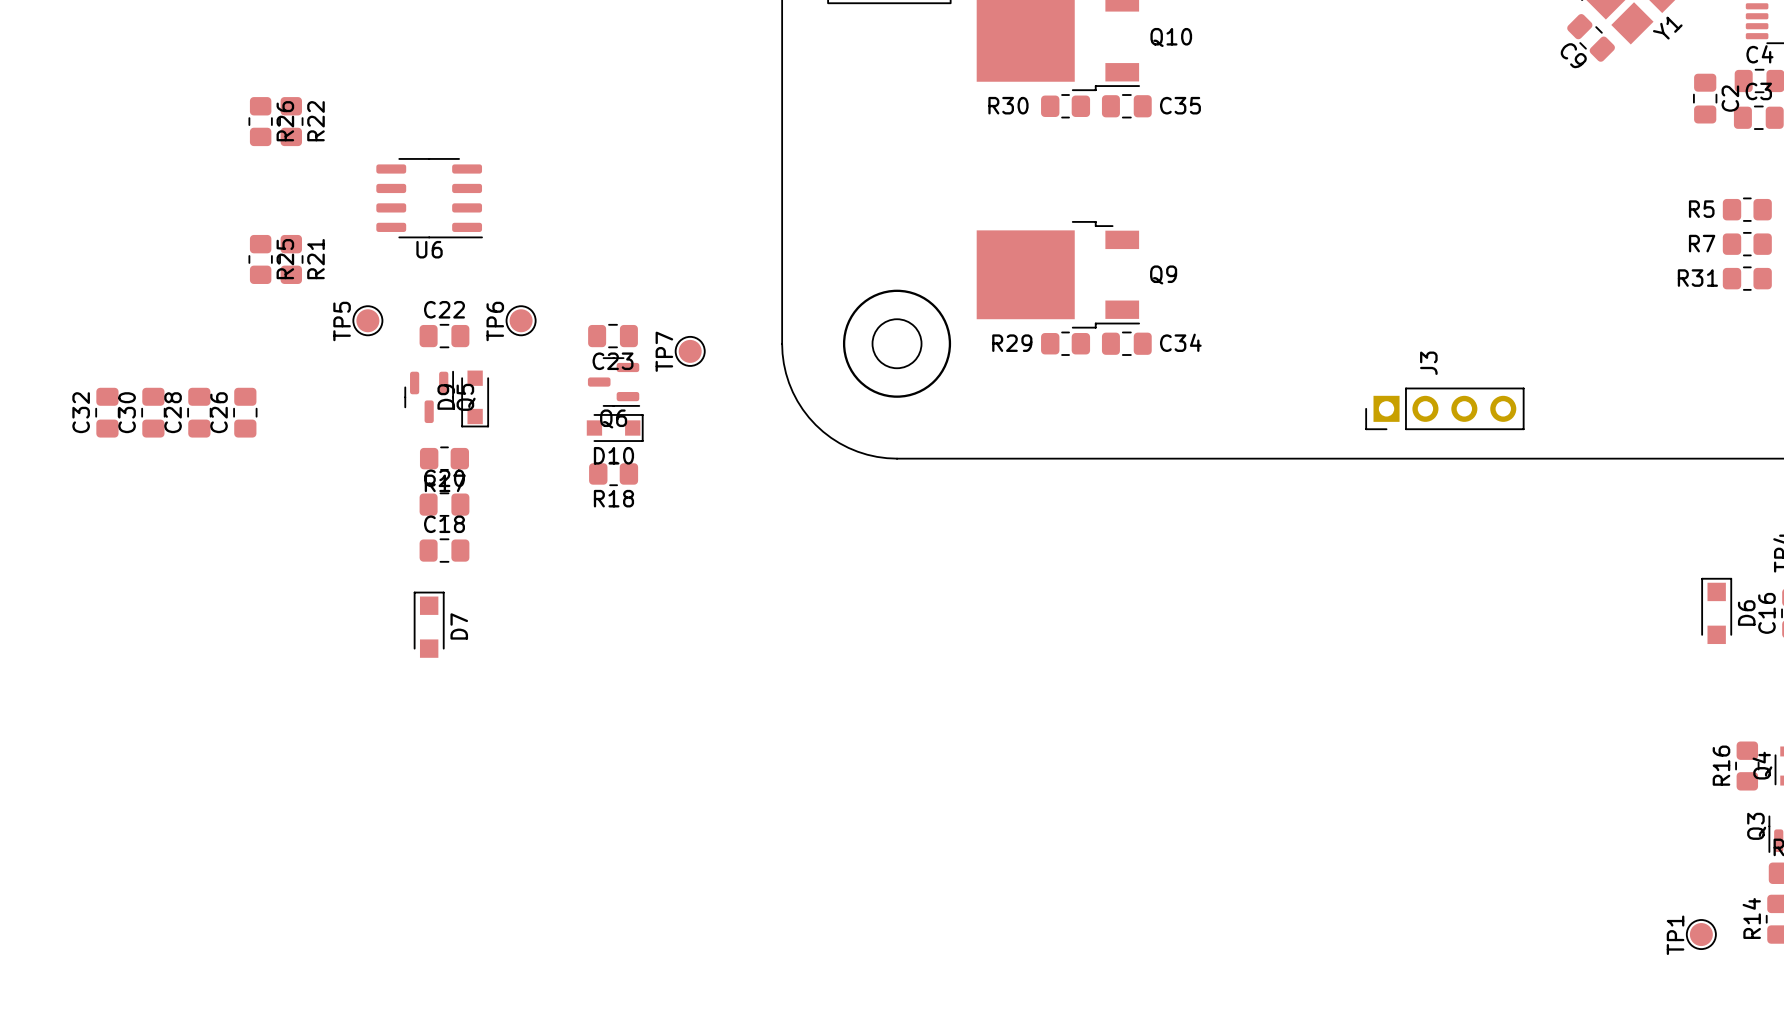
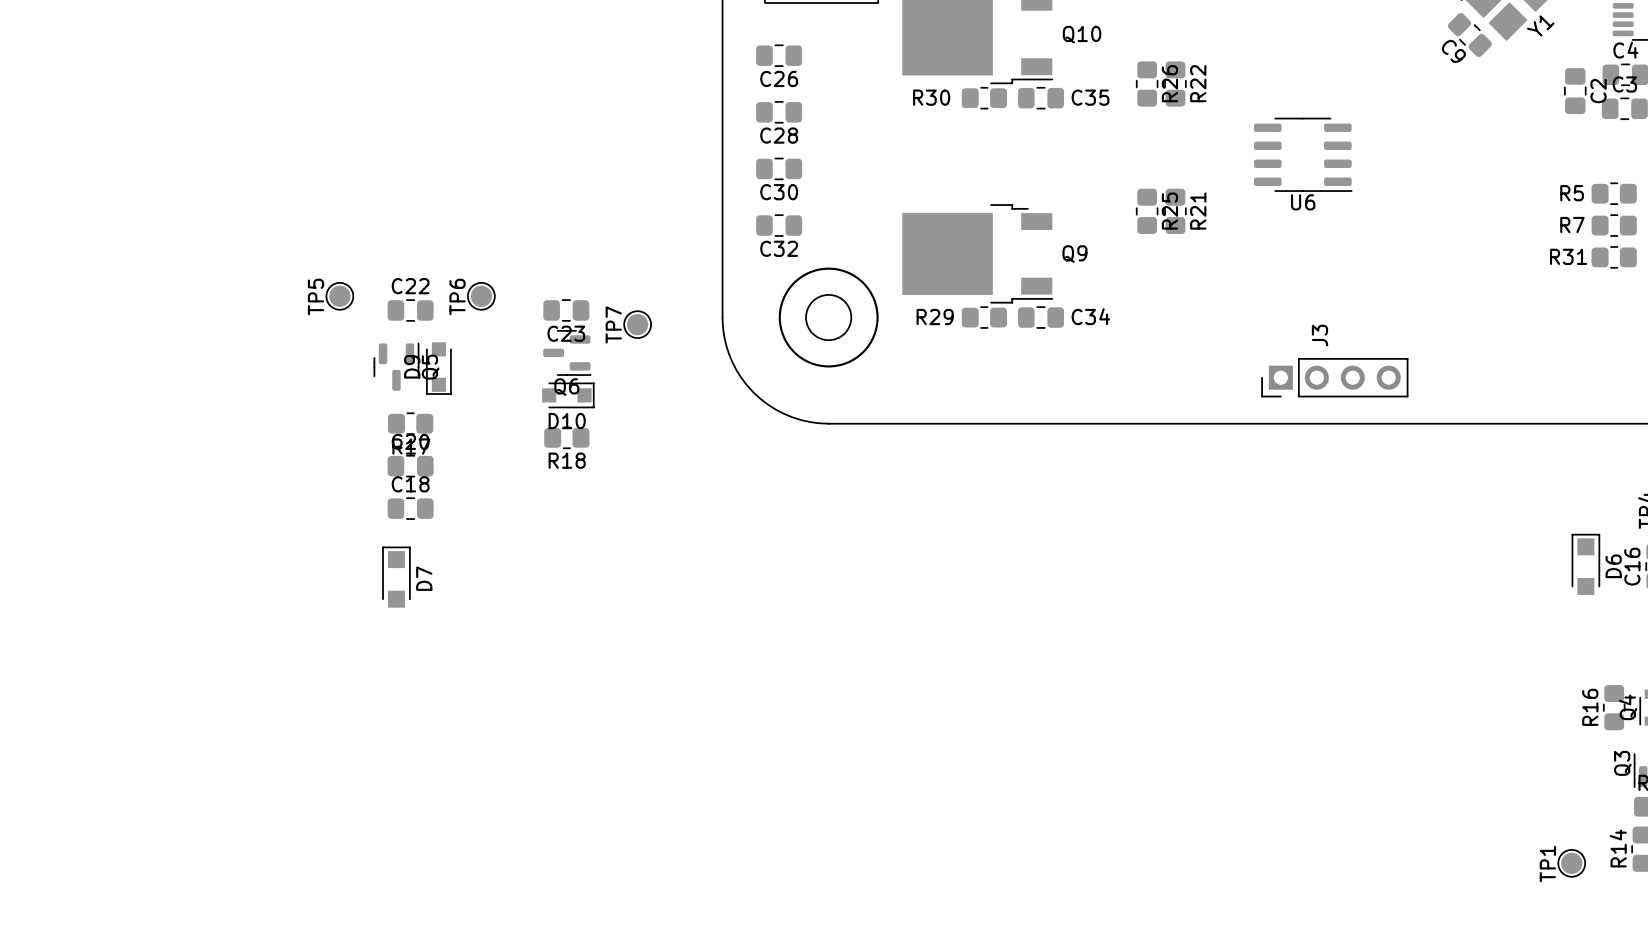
R26 position: (260, 121) -> (1147, 84)
R22 position: (291, 121) -> (1175, 84)
U6 position: (429, 198) -> (1303, 154)
R25 position: (260, 259) -> (1147, 211)
R21 position: (291, 259) -> (1175, 211)
C32 name position: C32 (81, 412) -> C32 (779, 248)
C32 rotation: 0° (107, 412) -> 90° clockwise (779, 225)
C32 position: (107, 412) -> (779, 225)
C30 name position: C30 (127, 412) -> C30 (779, 192)
C30 rotation: 0° (153, 412) -> 90° clockwise (779, 168)
C30 position: (153, 412) -> (779, 168)
C28 name position: C28 (173, 412) -> C28 (779, 135)
C28 rotation: 0° (199, 412) -> 90° clockwise (779, 112)
C28 position: (199, 412) -> (779, 112)
C26 name position: C26 (219, 412) -> C26 (779, 78)
C26 rotation: 0° (245, 412) -> 90° clockwise (779, 55)
C26 position: (245, 412) -> (779, 55)

